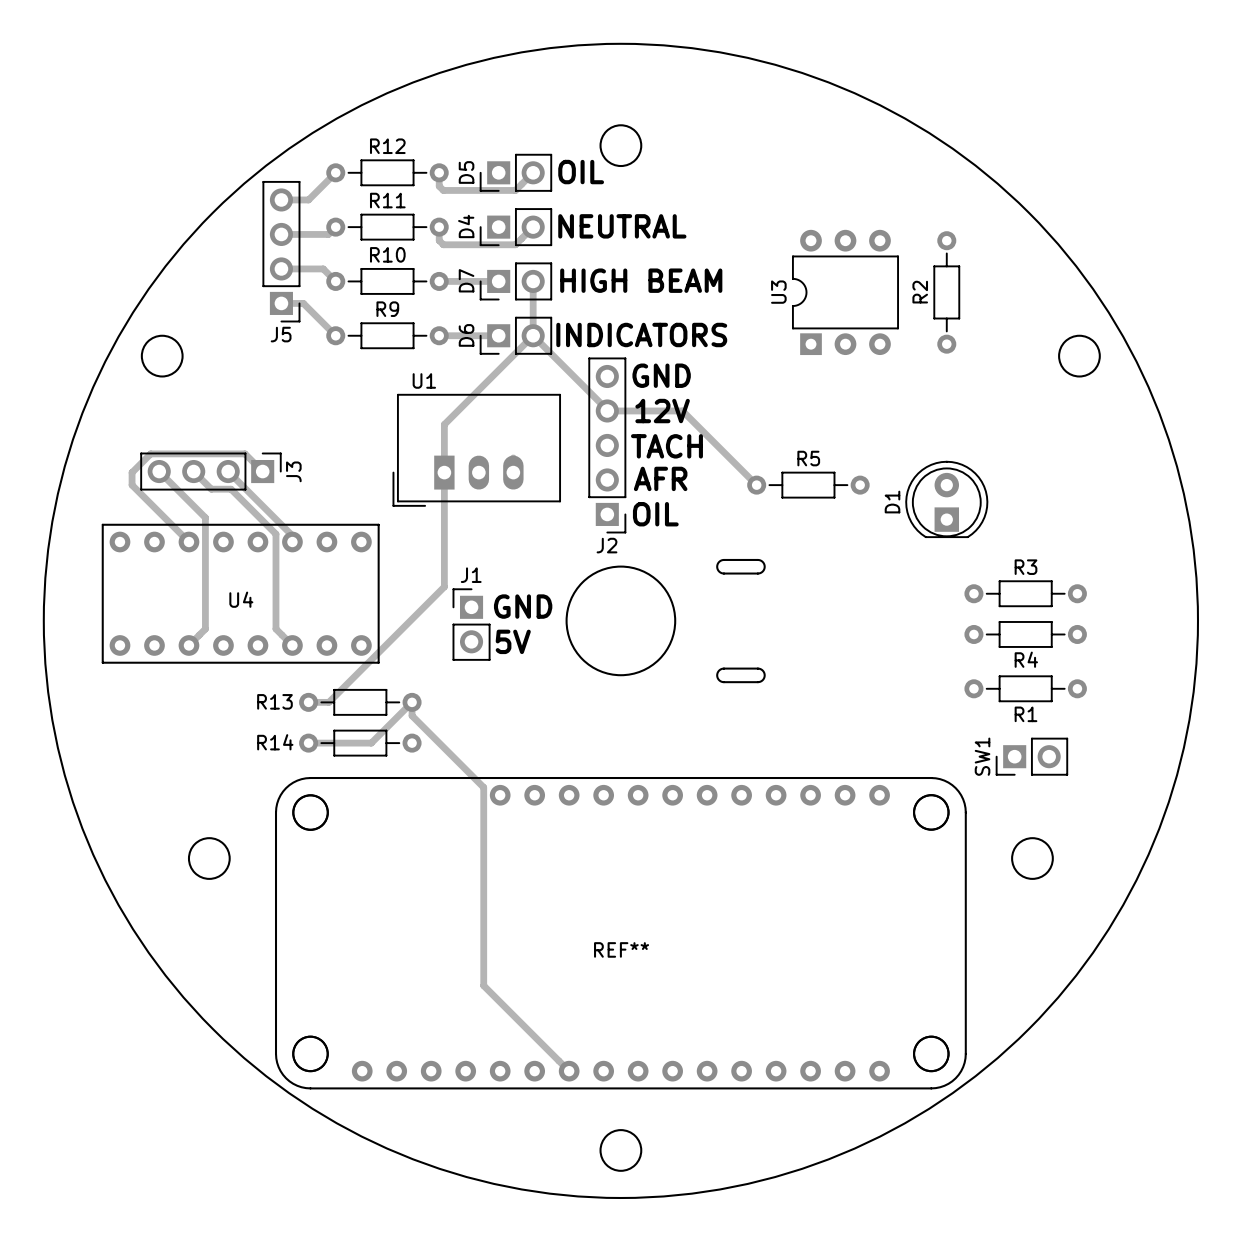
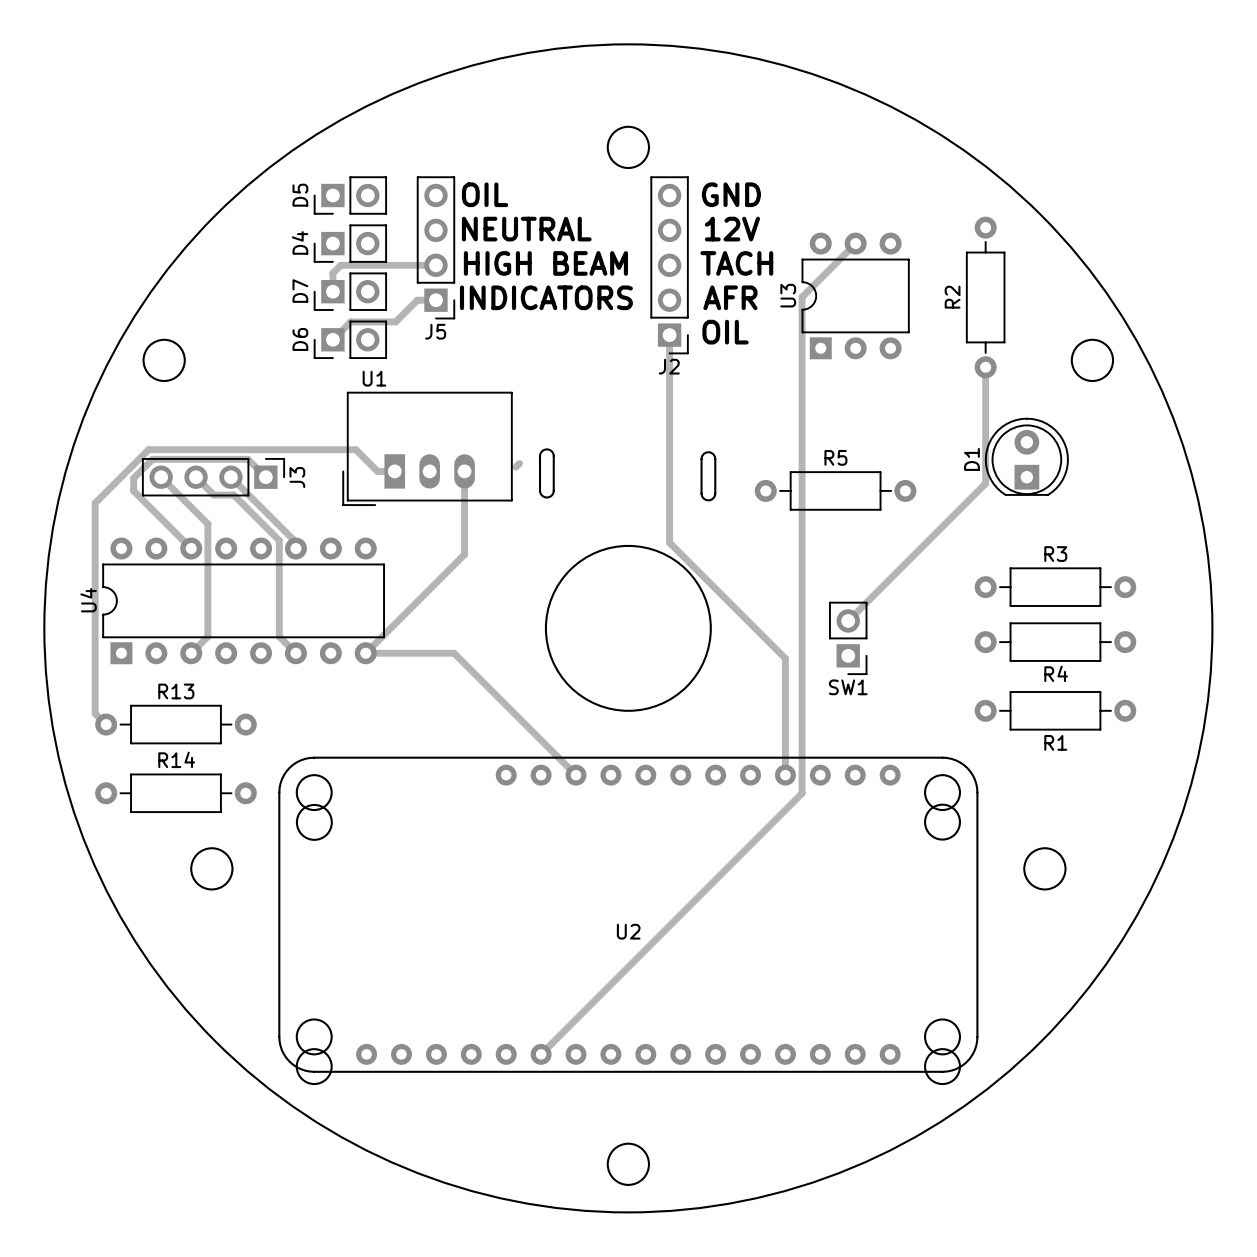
track: (335, 172) (308, 199) (281, 199) -> none
R12: (387, 172) -> none
track: (439, 172) (439, 186) (443, 190) (515, 190) (533, 172) -> none
D5 position: (515, 172) -> (350, 195)
text: OIL (581, 172) -> none
text: none -> OIL (485, 194)
text position: NEUTRAL (622, 226) -> NEUTRAL (526, 229)
track: (335, 227) (328, 234) (281, 234) -> none
R11: (387, 227) -> none
track: (439, 227) (439, 240) (443, 244) (515, 244) (533, 227) -> none
D4 position: (515, 227) -> (350, 243)
R2 footprint: [933, 231, 961, 354] -> [966, 216, 1006, 379]
track: none -> (855, 243) (802, 297) (802, 793) (541, 1054)
J5 position: (281, 251) -> (435, 247)
track: none -> (435, 265) (340, 265) (332, 273) (332, 291)
track: (281, 268) (323, 268) (335, 281) -> none
text position: HIGH BEAM (641, 280) -> HIGH BEAM (545, 263)
R10: (387, 281) -> none
track: (439, 281) (498, 281) -> none
D7 position: (515, 281) -> (350, 291)
track: (533, 281) (533, 335) -> none
track: none -> (435, 300) (417, 300) (395, 321) (350, 321) (332, 339)
track: (281, 303) (303, 303) (335, 335) -> none
text: none -> OIL (725, 332)
track: none -> (669, 335) (669, 542) (785, 658) (785, 775)
text position: INDICATORS (641, 334) -> INDICATORS (546, 297)
R9: (387, 335) -> none
track: (439, 335) (498, 335) -> none
D6 position: (515, 335) -> (350, 339)
track: (533, 335) (444, 424) (444, 586) (328, 702) (308, 702) -> none
track: (533, 335) (607, 410) (682, 410) (756, 485) -> none
track: none -> (985, 367) (985, 483) (848, 620)
text position: GND (661, 375) -> GND (731, 194)
text position: 12V (662, 411) -> 12V (732, 229)
J2 position: (607, 445) -> (669, 265)
text position: TACH (666, 446) -> TACH (736, 263)
U1 position: (476, 450) -> (427, 448)
board edge: none -> (540, 456) (540, 492) (543, 496) (548, 497) (553, 491) (553, 454) (551, 450) (545, 449) (542, 451) (540, 456)
board edge: none -> (701, 459) (701, 495) (704, 499) (710, 500) (715, 494) (715, 457) (712, 453) (707, 452) (703, 454) (701, 459)
track: none -> (394, 471) (377, 471) (355, 449) (148, 449) (95, 503) (95, 713) (106, 724)
track: none -> (464, 471) (464, 554) (365, 653) (454, 653) (576, 775)
R5 footprint: [747, 471, 870, 499] -> [754, 471, 917, 511]
text position: AFR (660, 478) -> AFR (730, 297)
D1 position: (946, 499) -> (1026, 456)
text: OIL (655, 514) -> none
U4 footprint: [101, 523, 380, 664] -> [102, 537, 385, 665]
board edge: (723, 559) (759, 560) (763, 563) (764, 568) (758, 573) (722, 573) (718, 570) (717, 565) (719, 561) (723, 559) -> none
round board edge size: [565, 565, 677, 677] -> [544, 544, 712, 712]
R3 footprint: [964, 580, 1087, 608] -> [974, 567, 1137, 607]
U4 name position: U4 (241, 599) -> U4 (88, 600)
text: GND (523, 606) -> none
R4 footprint: [964, 621, 1087, 648] -> [974, 622, 1137, 662]
J1: (471, 624) -> none
text: 5V (513, 641) -> none
board edge: (723, 668) (759, 668) (763, 671) (764, 677) (758, 682) (722, 681) (718, 679) (717, 674) (719, 669) (723, 668) -> none
R1 footprint: [964, 675, 1087, 703] -> [974, 691, 1137, 731]
R13 footprint: [299, 689, 422, 716] -> [95, 704, 257, 745]
R13 name position: R13 (274, 701) -> R13 (176, 691)
R14 footprint: [299, 729, 422, 757] -> [95, 773, 257, 813]
R14 name position: R14 (275, 742) -> R14 (176, 759)
track: (308, 743) (371, 743) (412, 702) (412, 715) (483, 787) (483, 985) (569, 1071) -> none
SW1 rotation: 0° (1031, 756) -> 90° counterclockwise (848, 638)
SW1 position: (1031, 756) -> (848, 638)
U2: none -> (628, 914)
REF**: (620, 933) -> none

